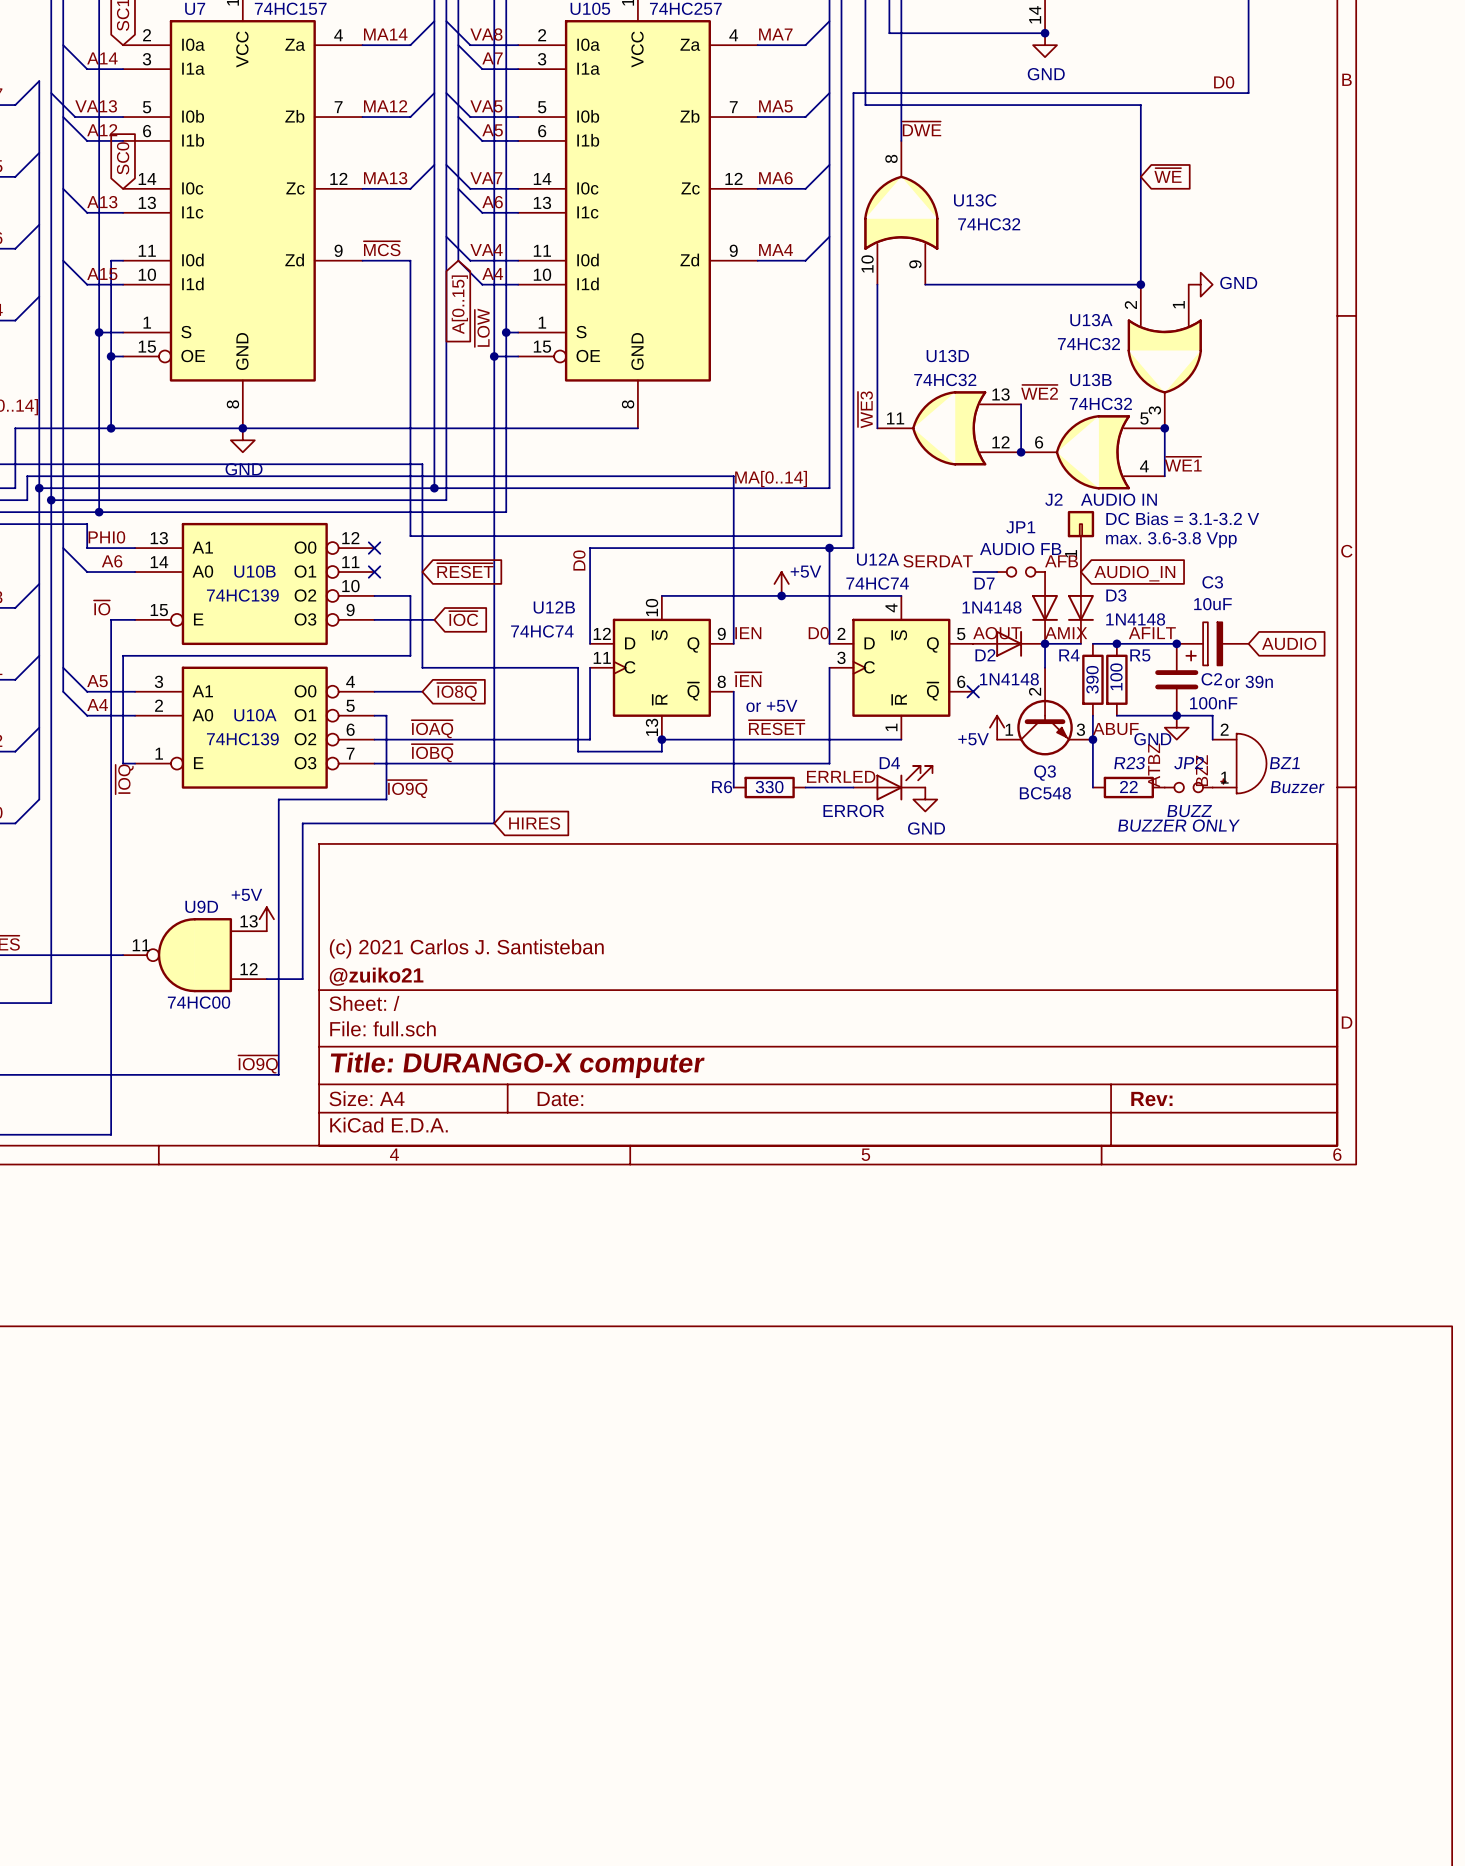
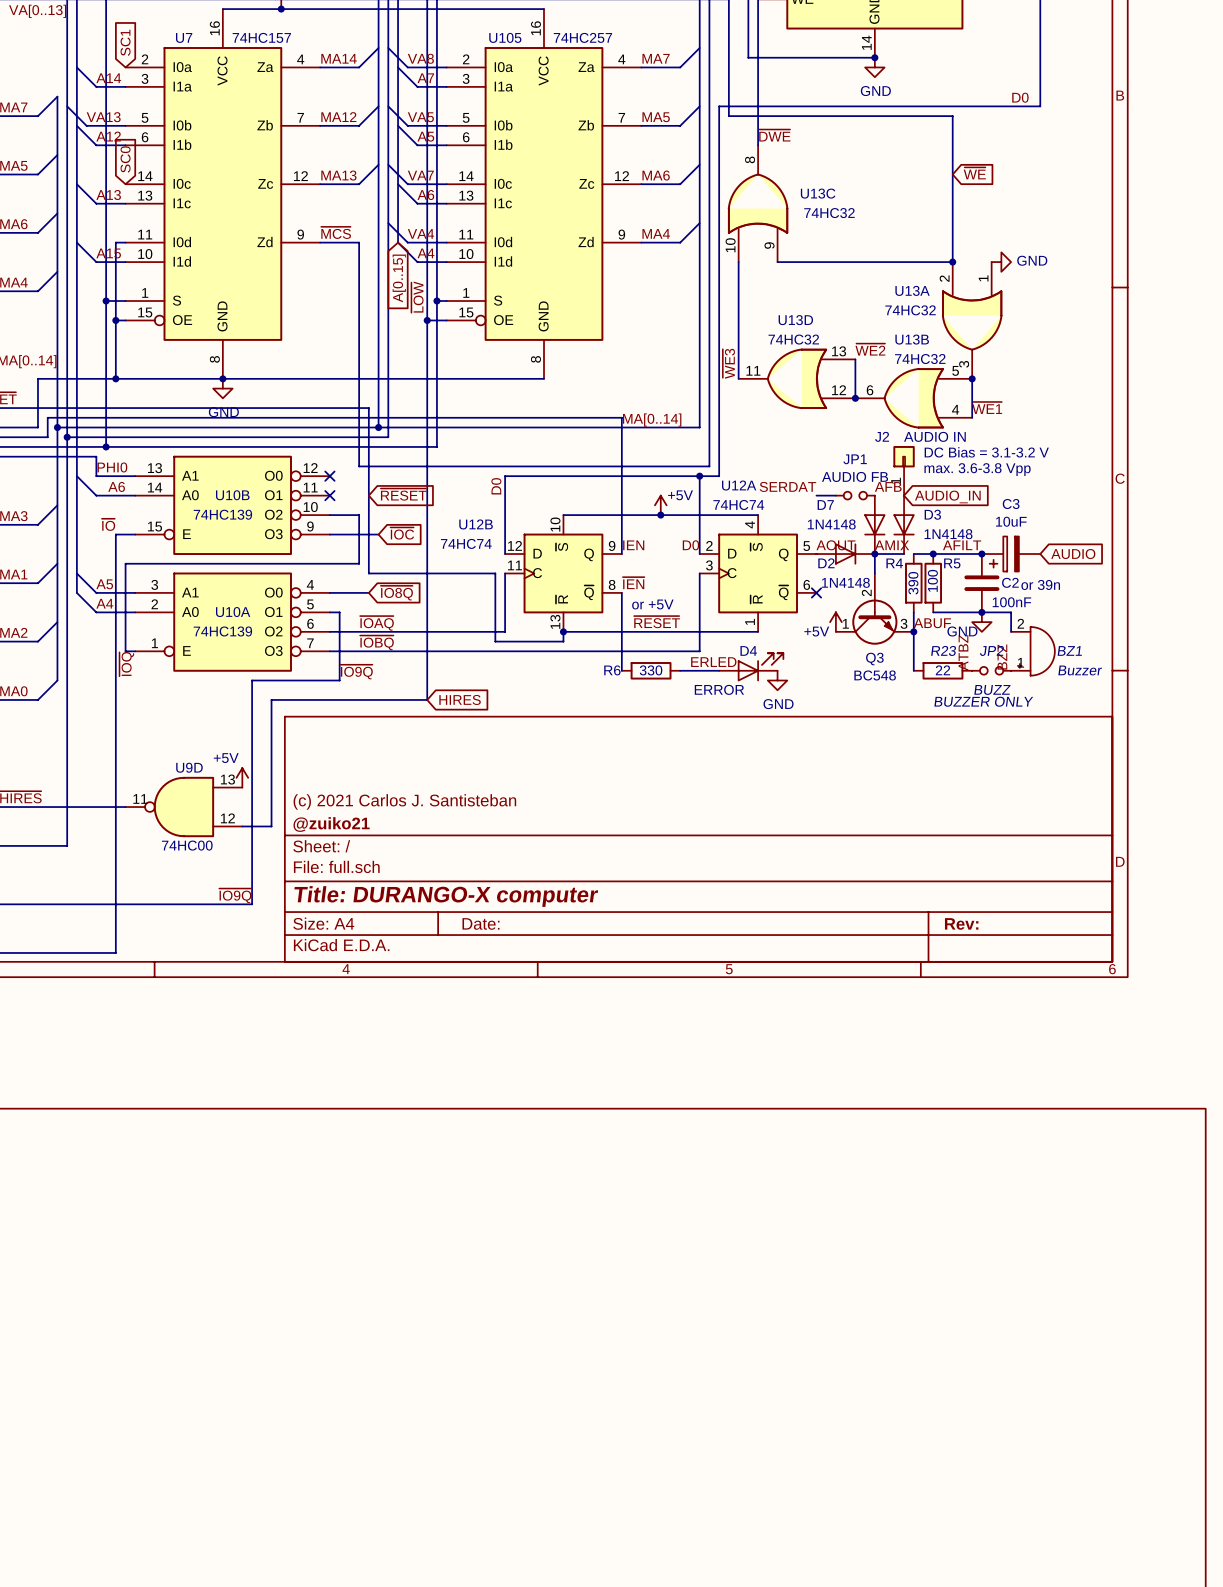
label: ERRLED (841, 776) -> ERLED (713, 662)

